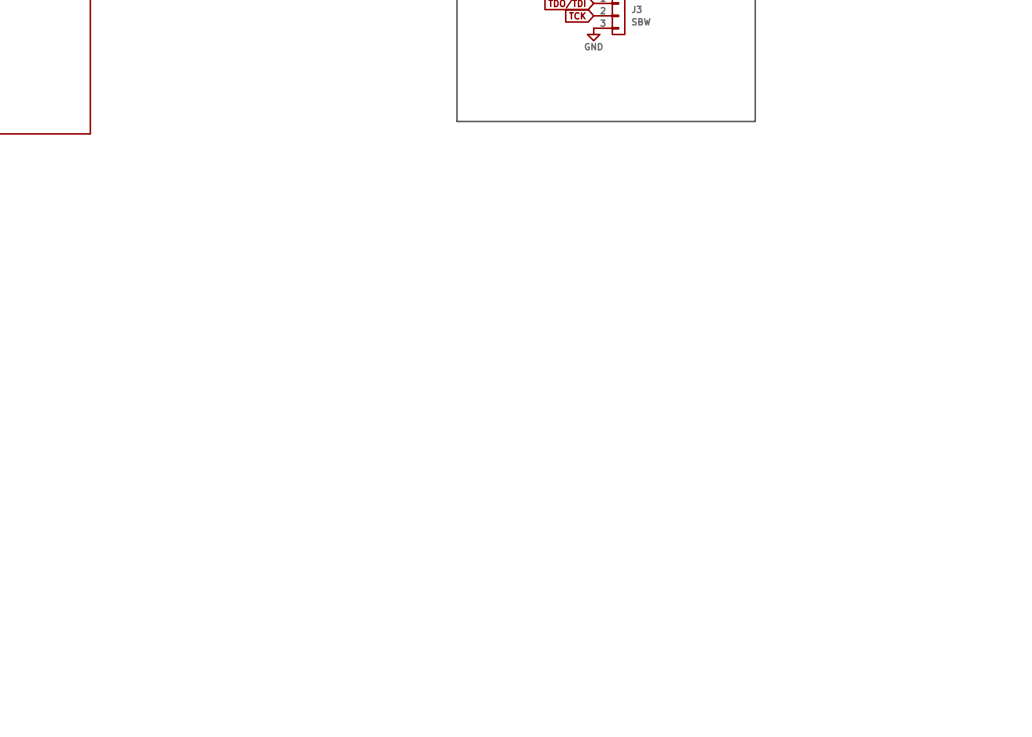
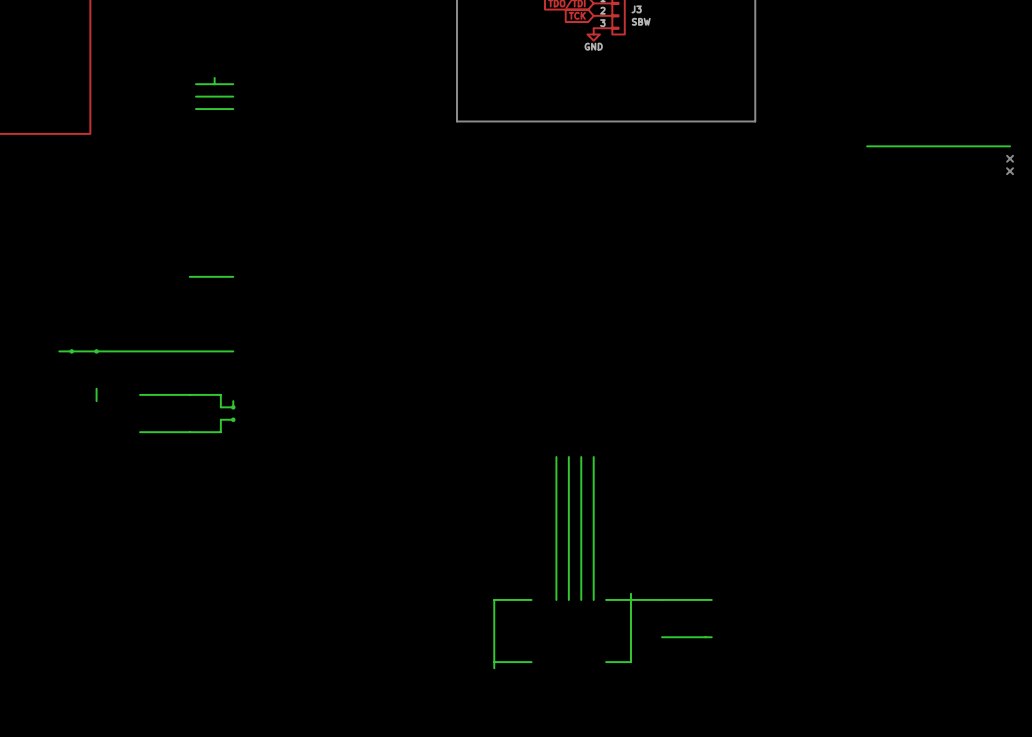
wire: none -> (214, 77) (214, 84)
wire: none -> (195, 84) (233, 84)
wire: none -> (195, 96) (233, 96)
wire: none -> (195, 109) (233, 109)
wire: none -> (867, 146) (1010, 146)
no-connect mark: none -> (1010, 158)
no-connect mark: none -> (1010, 171)
wire: none -> (189, 276) (233, 276)
wire: none -> (59, 351) (233, 351)
junction: none -> (71, 351)
junction: none -> (96, 351)
wire: none -> (96, 388) (96, 401)
wire: none -> (140, 394) (220, 394) (220, 407) (233, 407) (233, 401)
junction: none -> (233, 407)
wire: none -> (233, 419) (220, 419) (220, 432) (140, 432)
junction: none -> (233, 419)
wire: none -> (556, 457) (556, 599)
wire: none -> (568, 457) (568, 599)
wire: none -> (581, 457) (581, 599)
wire: none -> (593, 457) (593, 599)
wire: none -> (630, 593) (630, 662) (606, 662)
wire: none -> (531, 599) (494, 599) (494, 668)
wire: none -> (606, 599) (711, 599)
wire: none -> (662, 637) (711, 637)
wire: none -> (494, 662) (531, 662)

